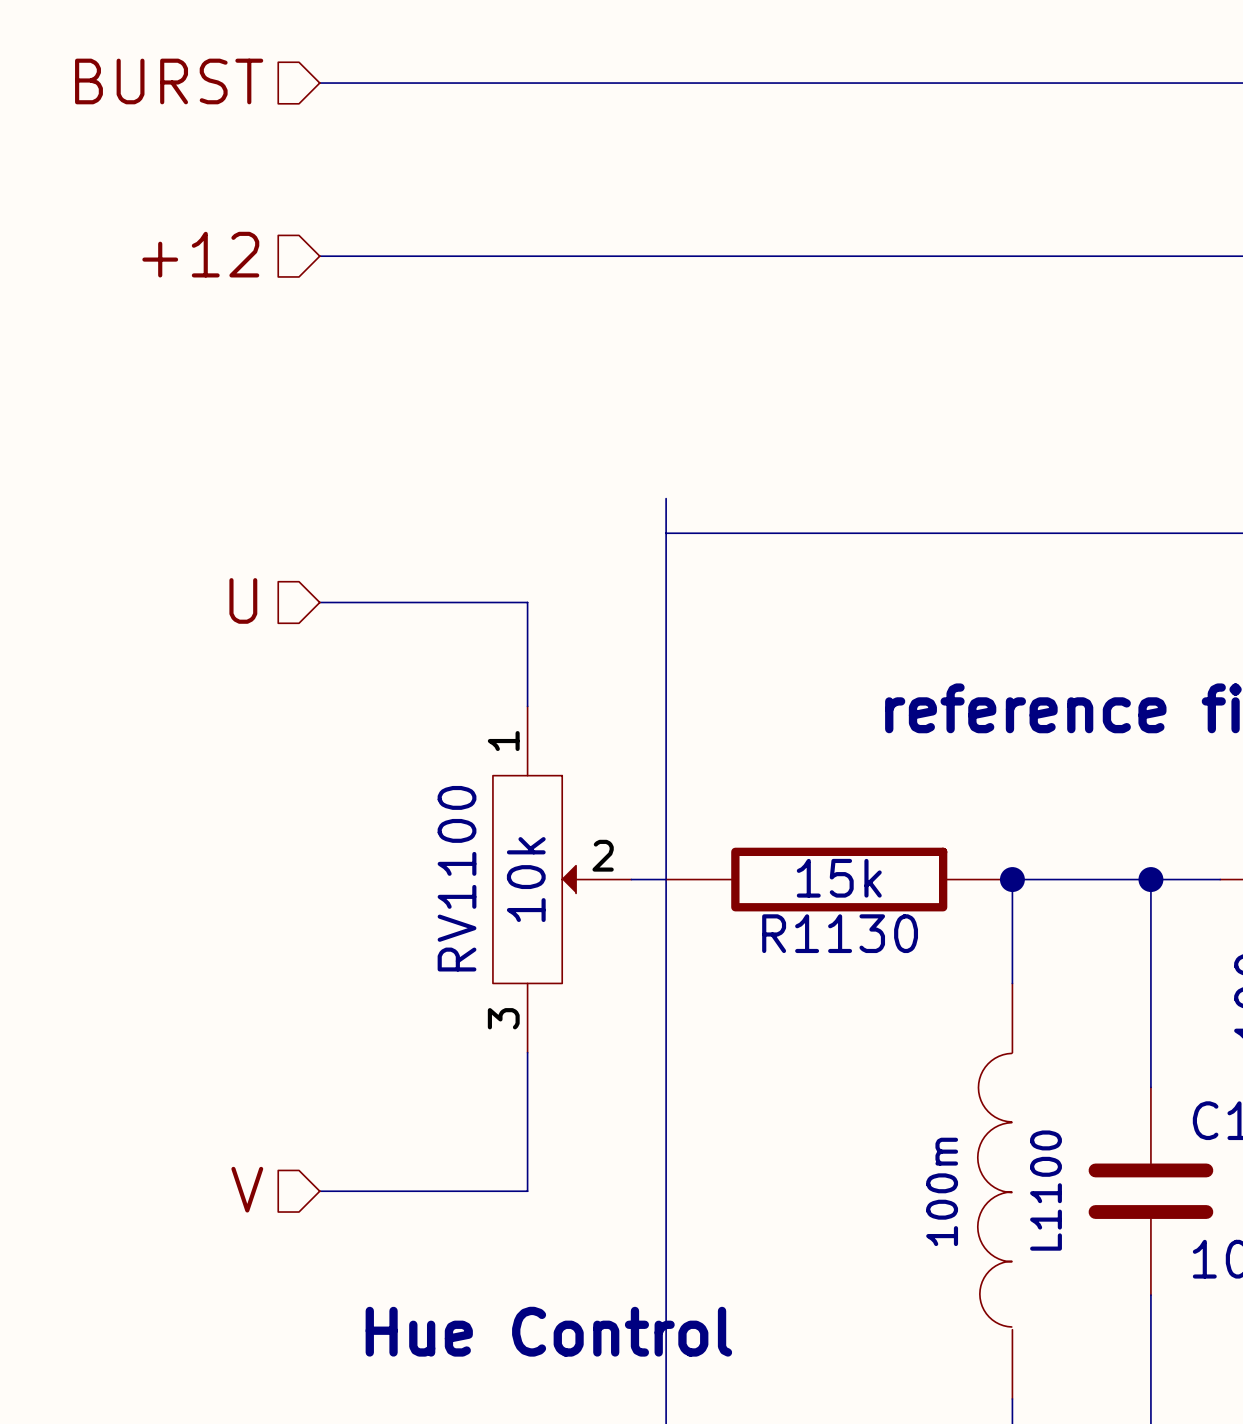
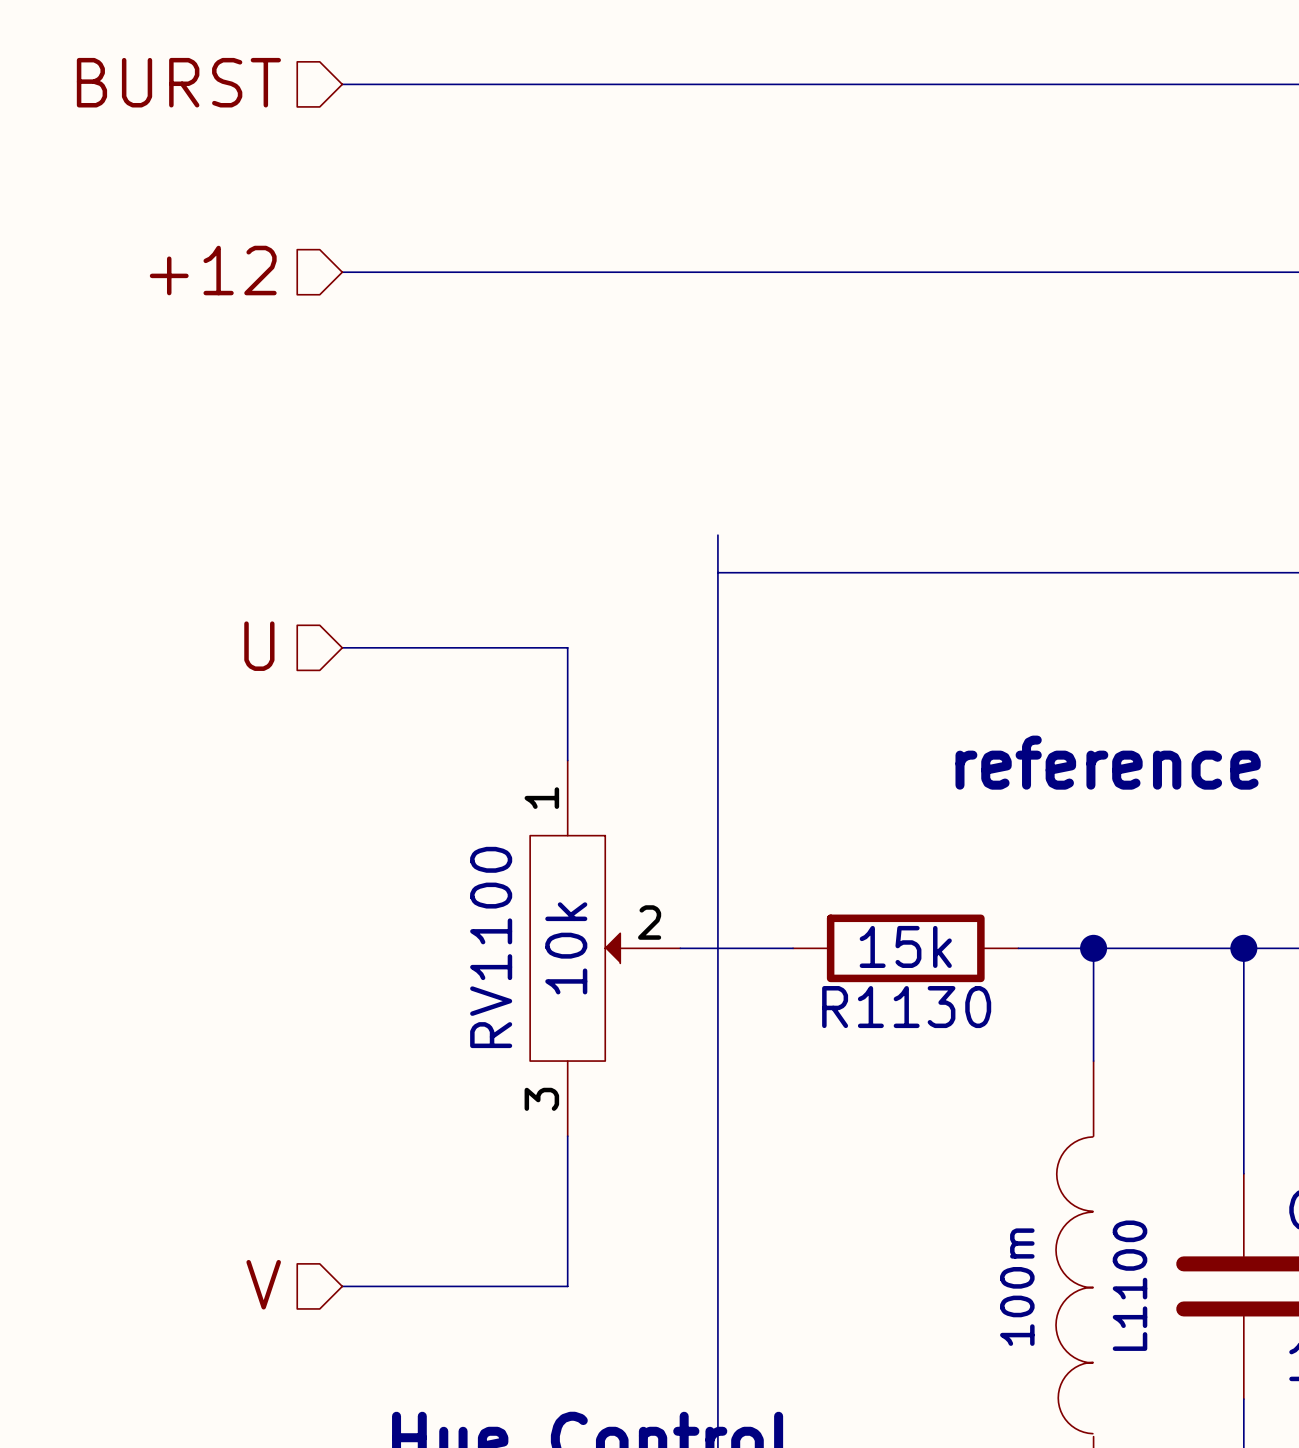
R1130 symbol: [666, 847, 1013, 912] -> [793, 914, 1019, 983]

